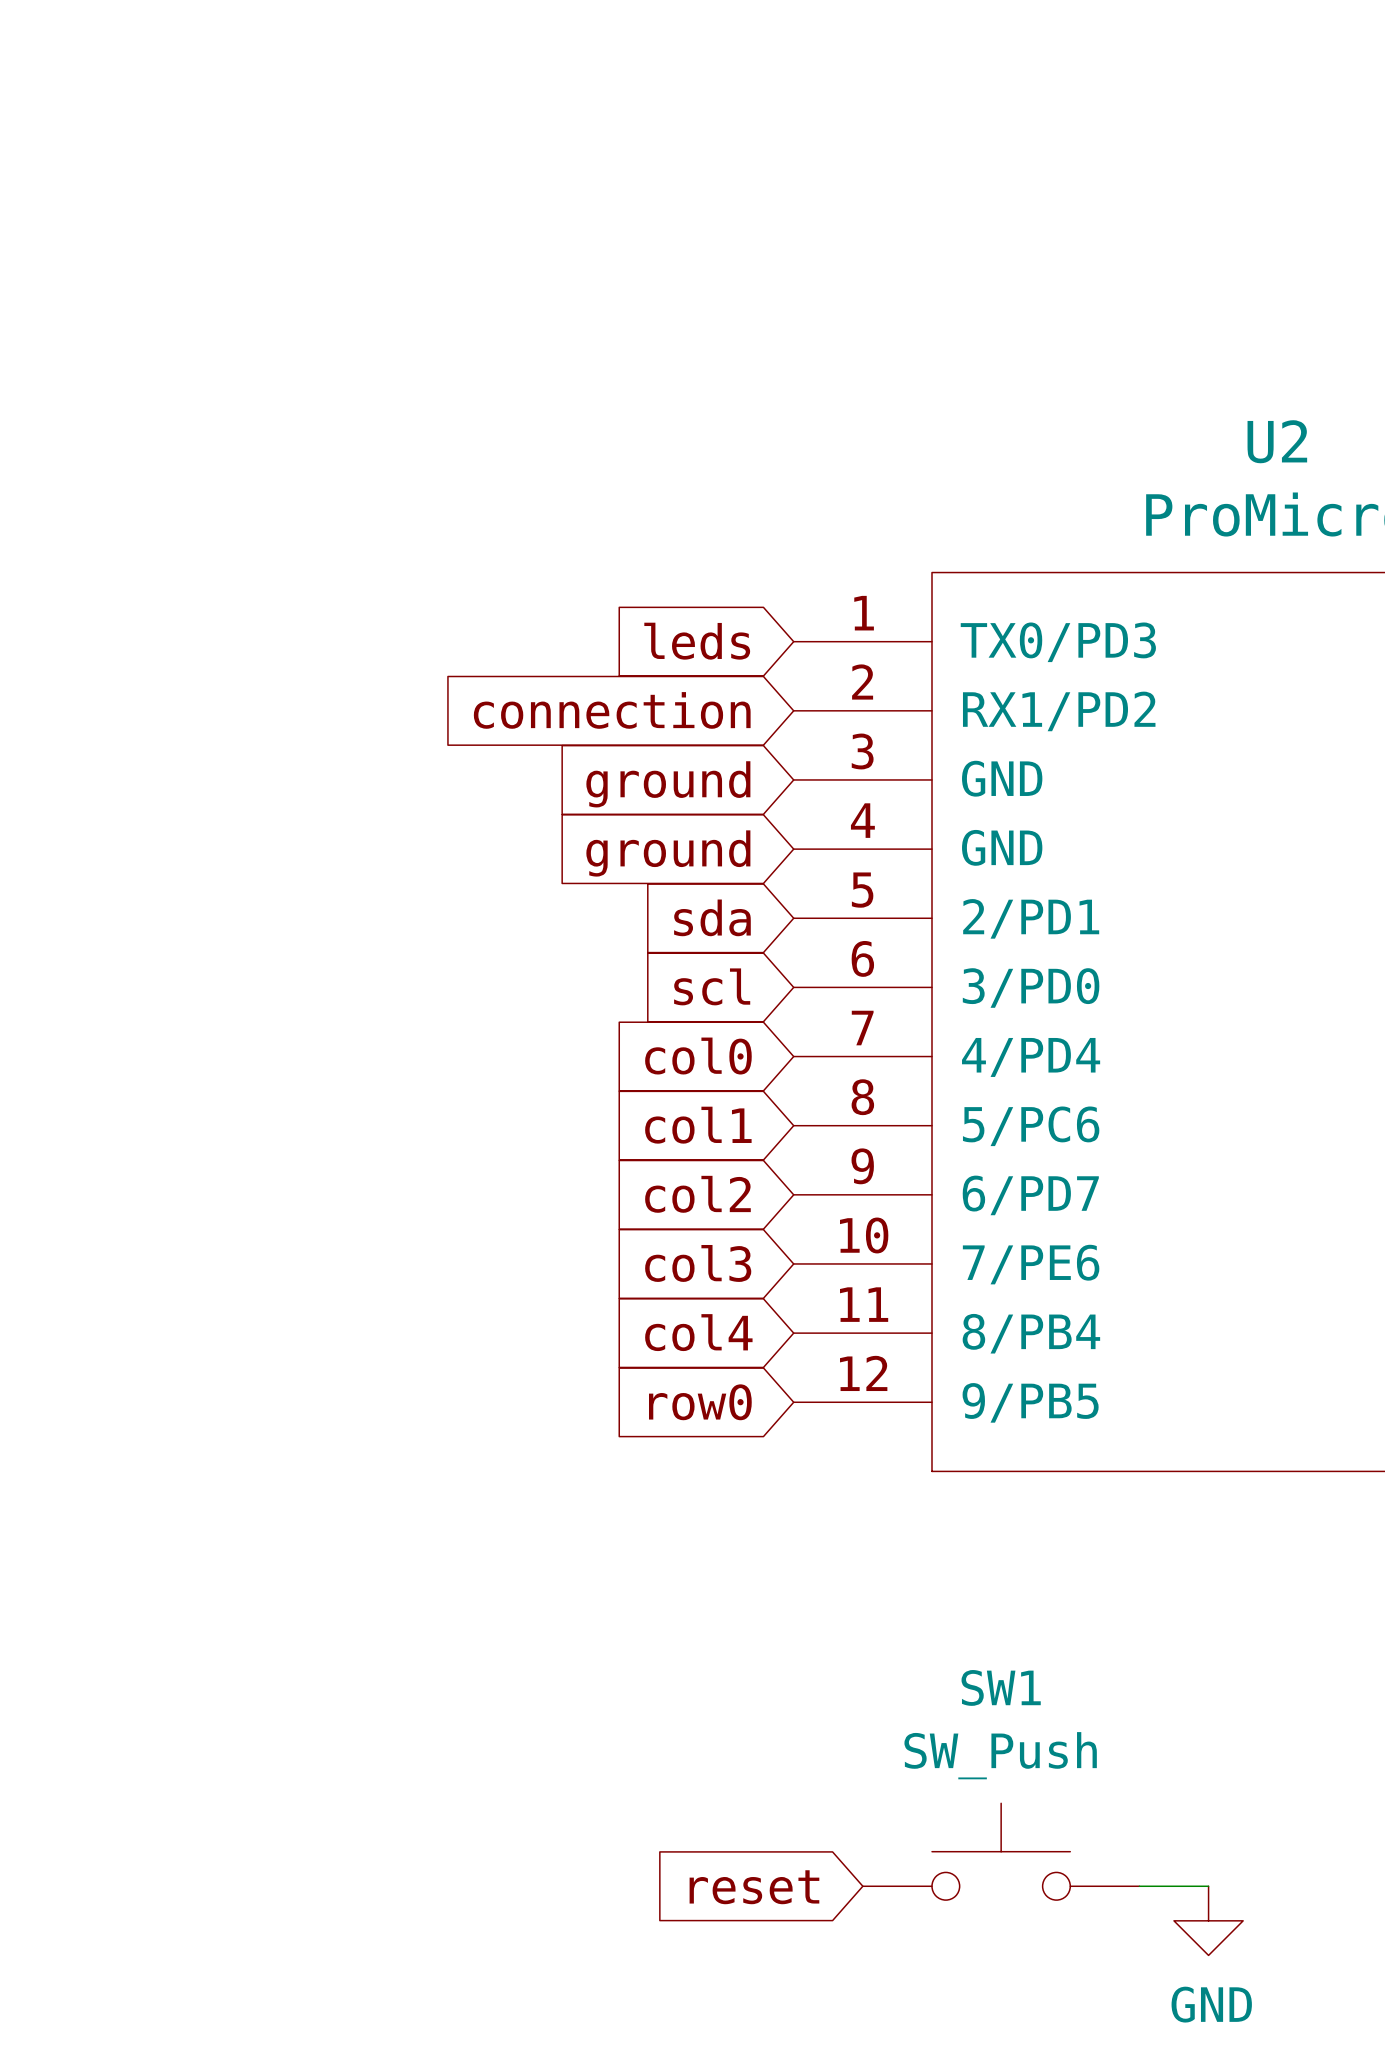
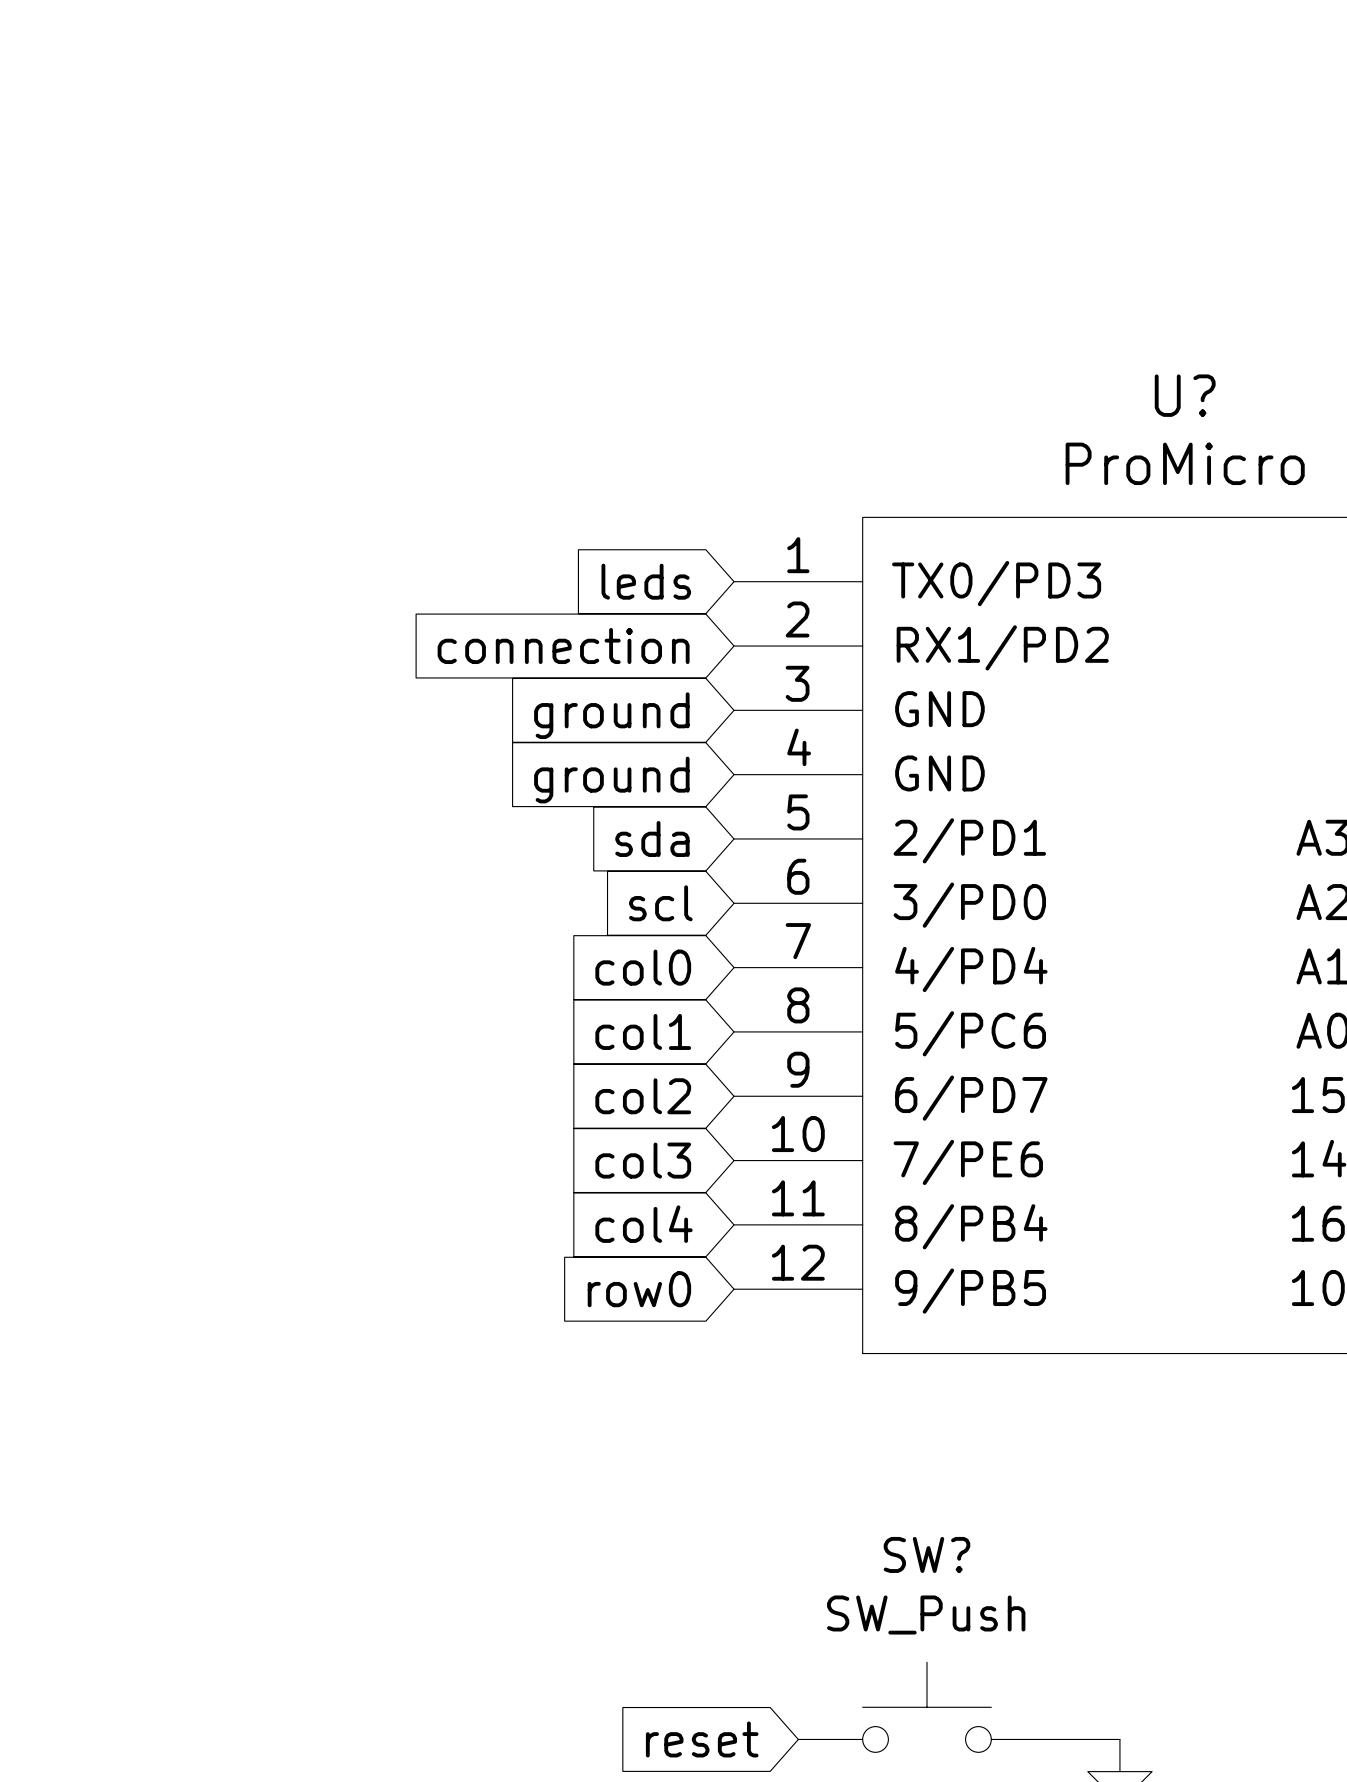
U2 name: U2 (1277, 441) -> U? (1185, 395)
SW1 name: SW1 (1001, 1687) -> SW? (926, 1554)

